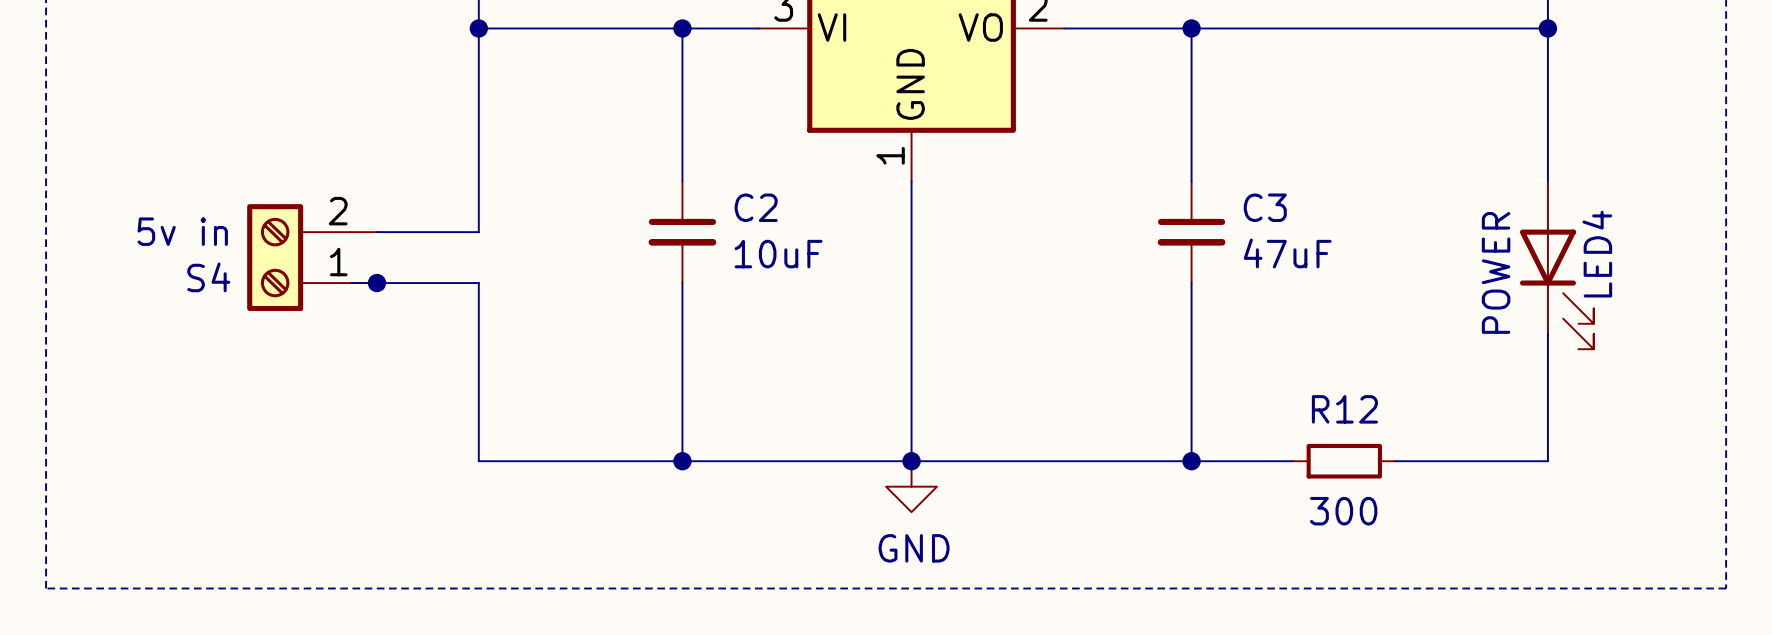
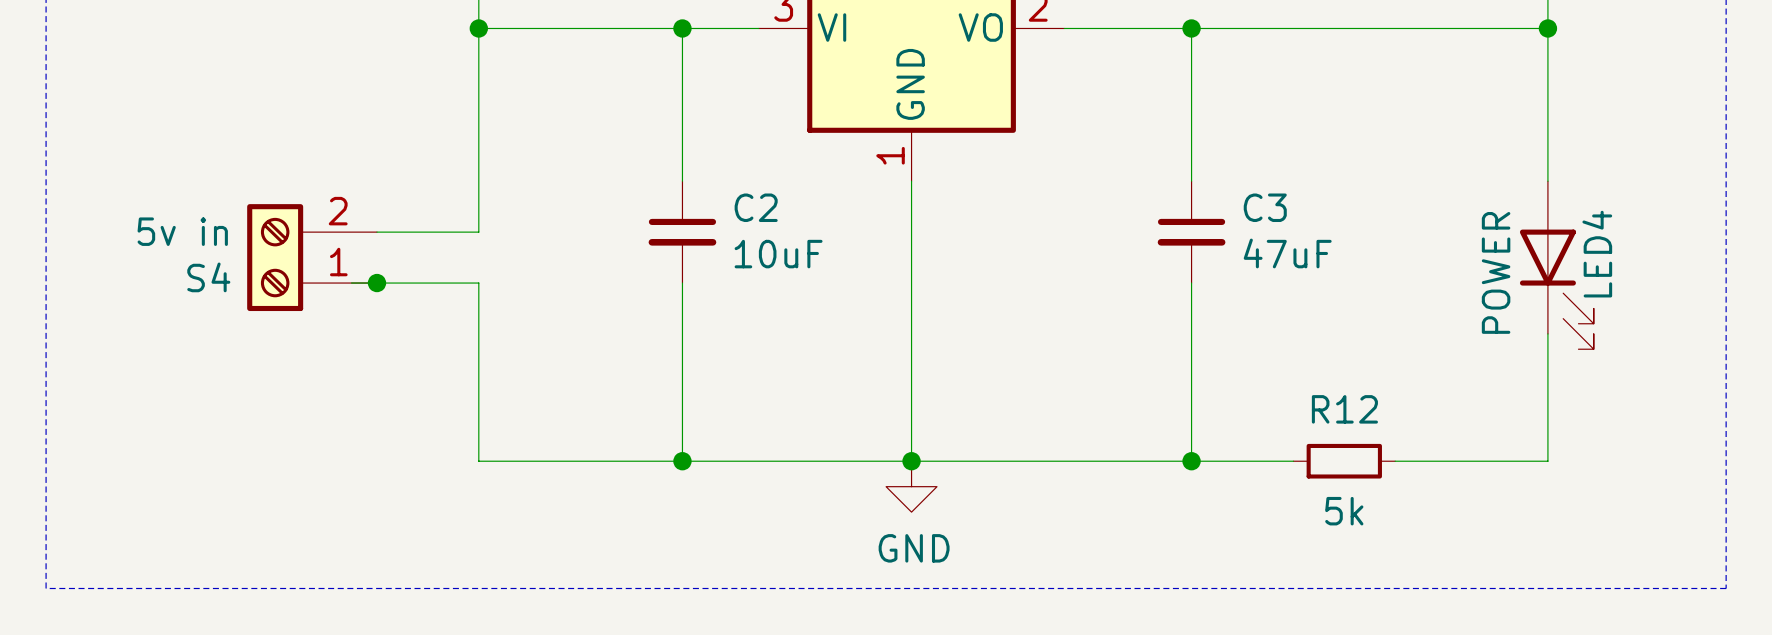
R12 value: 300 (1343, 511) -> 5k (1344, 511)

